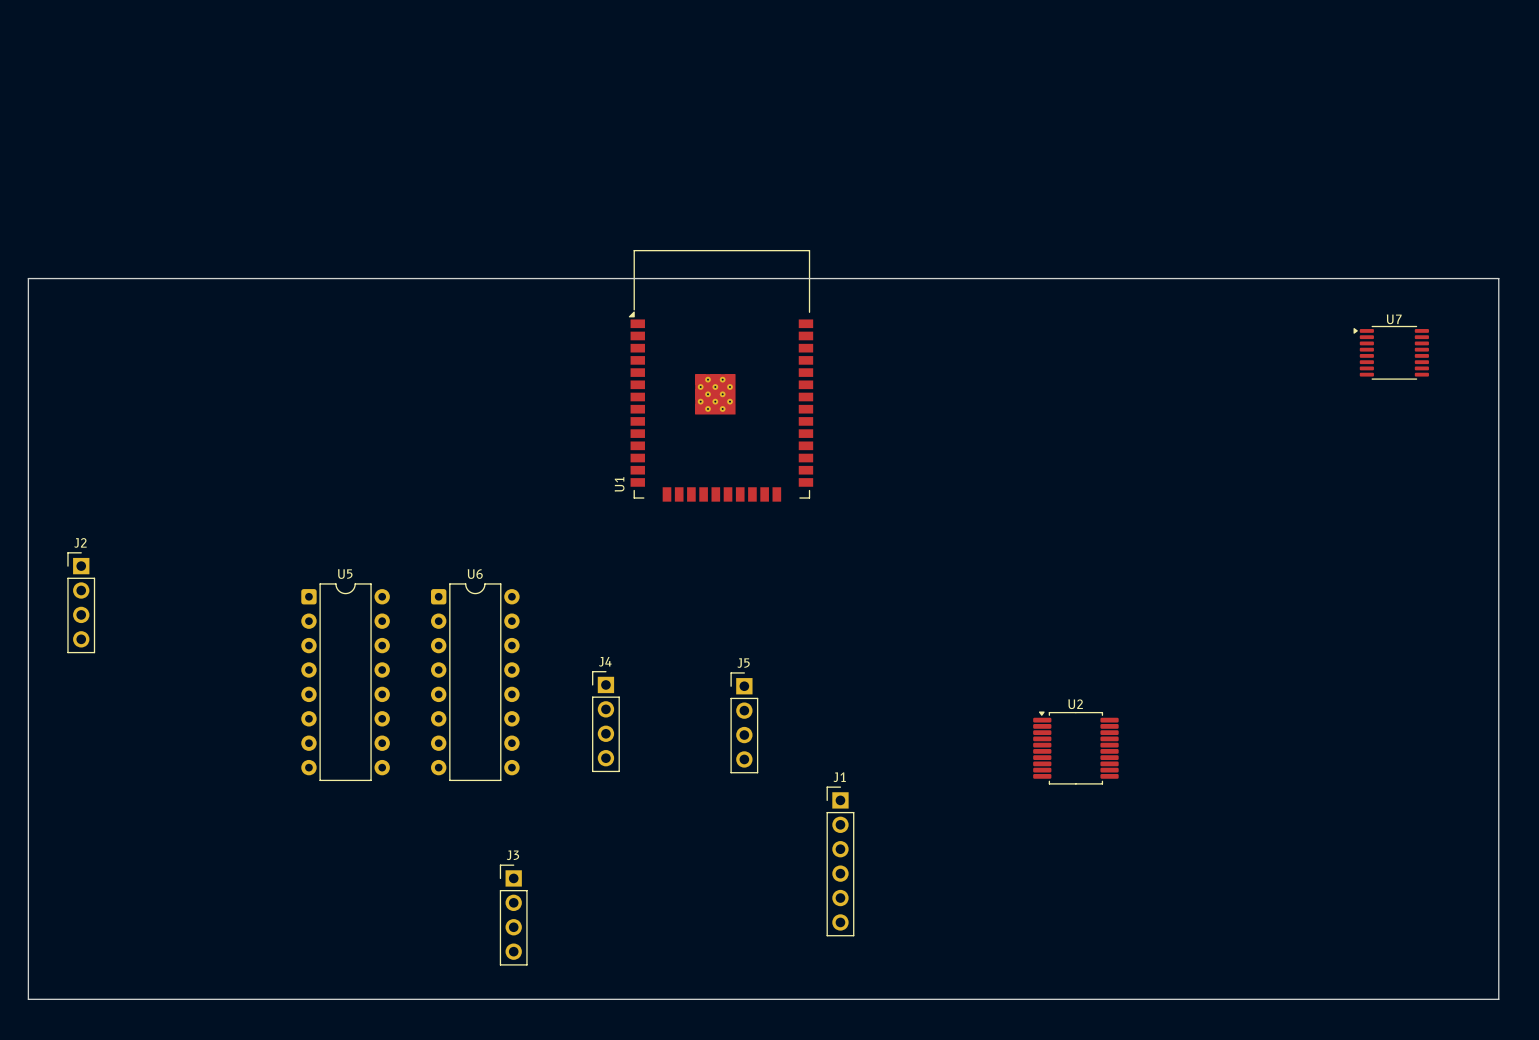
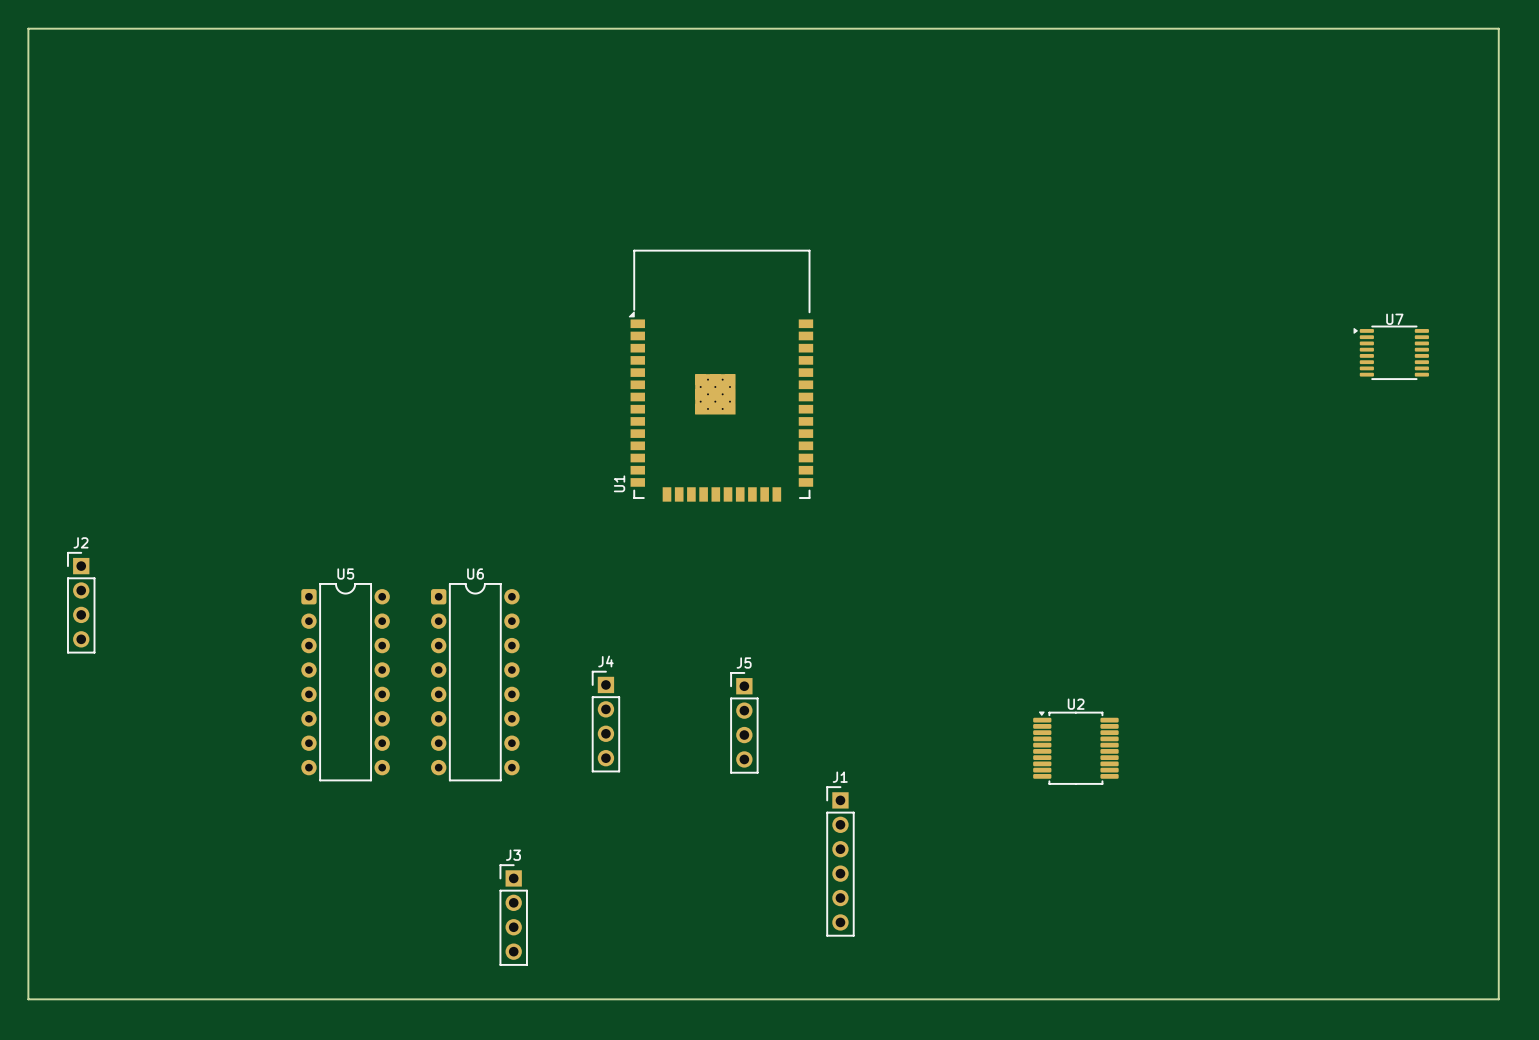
board edge: (28, 278) (1498, 278) -> (28, 278) (28, 28) (1498, 28) (1498, 278)

